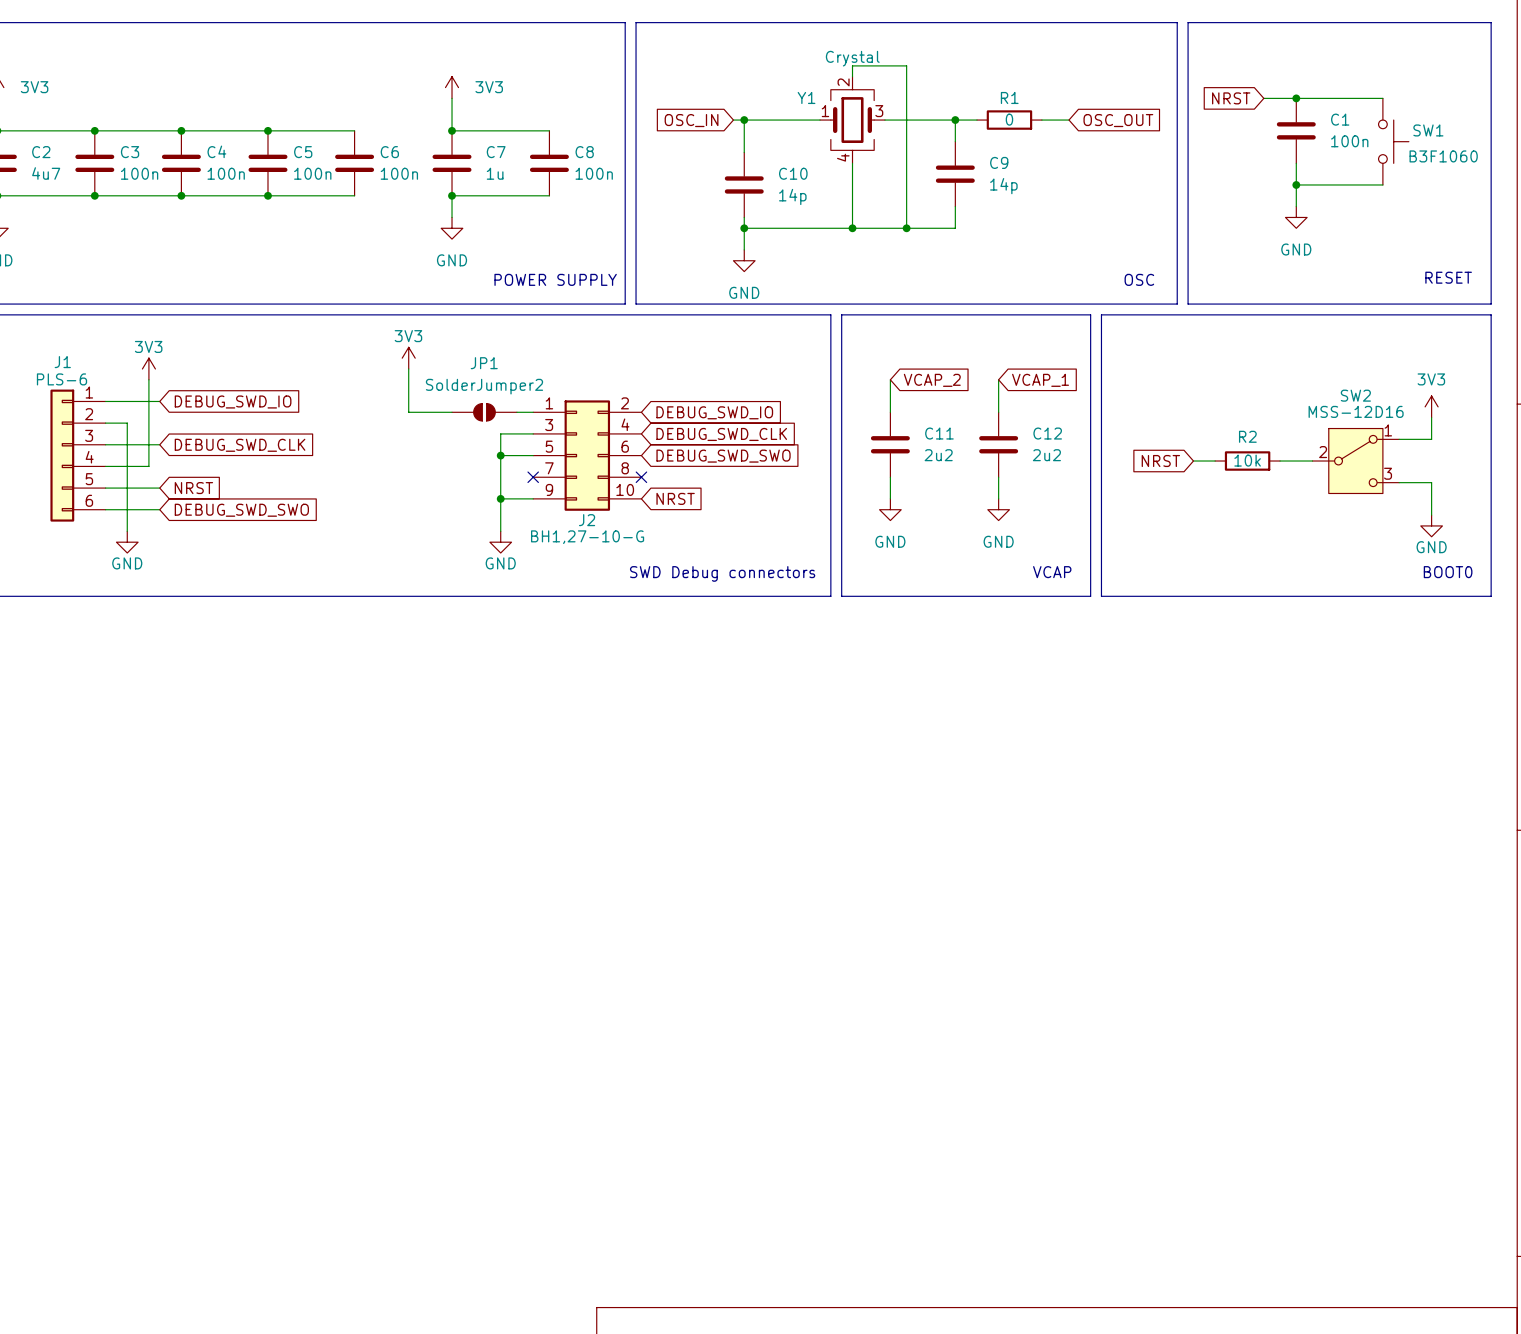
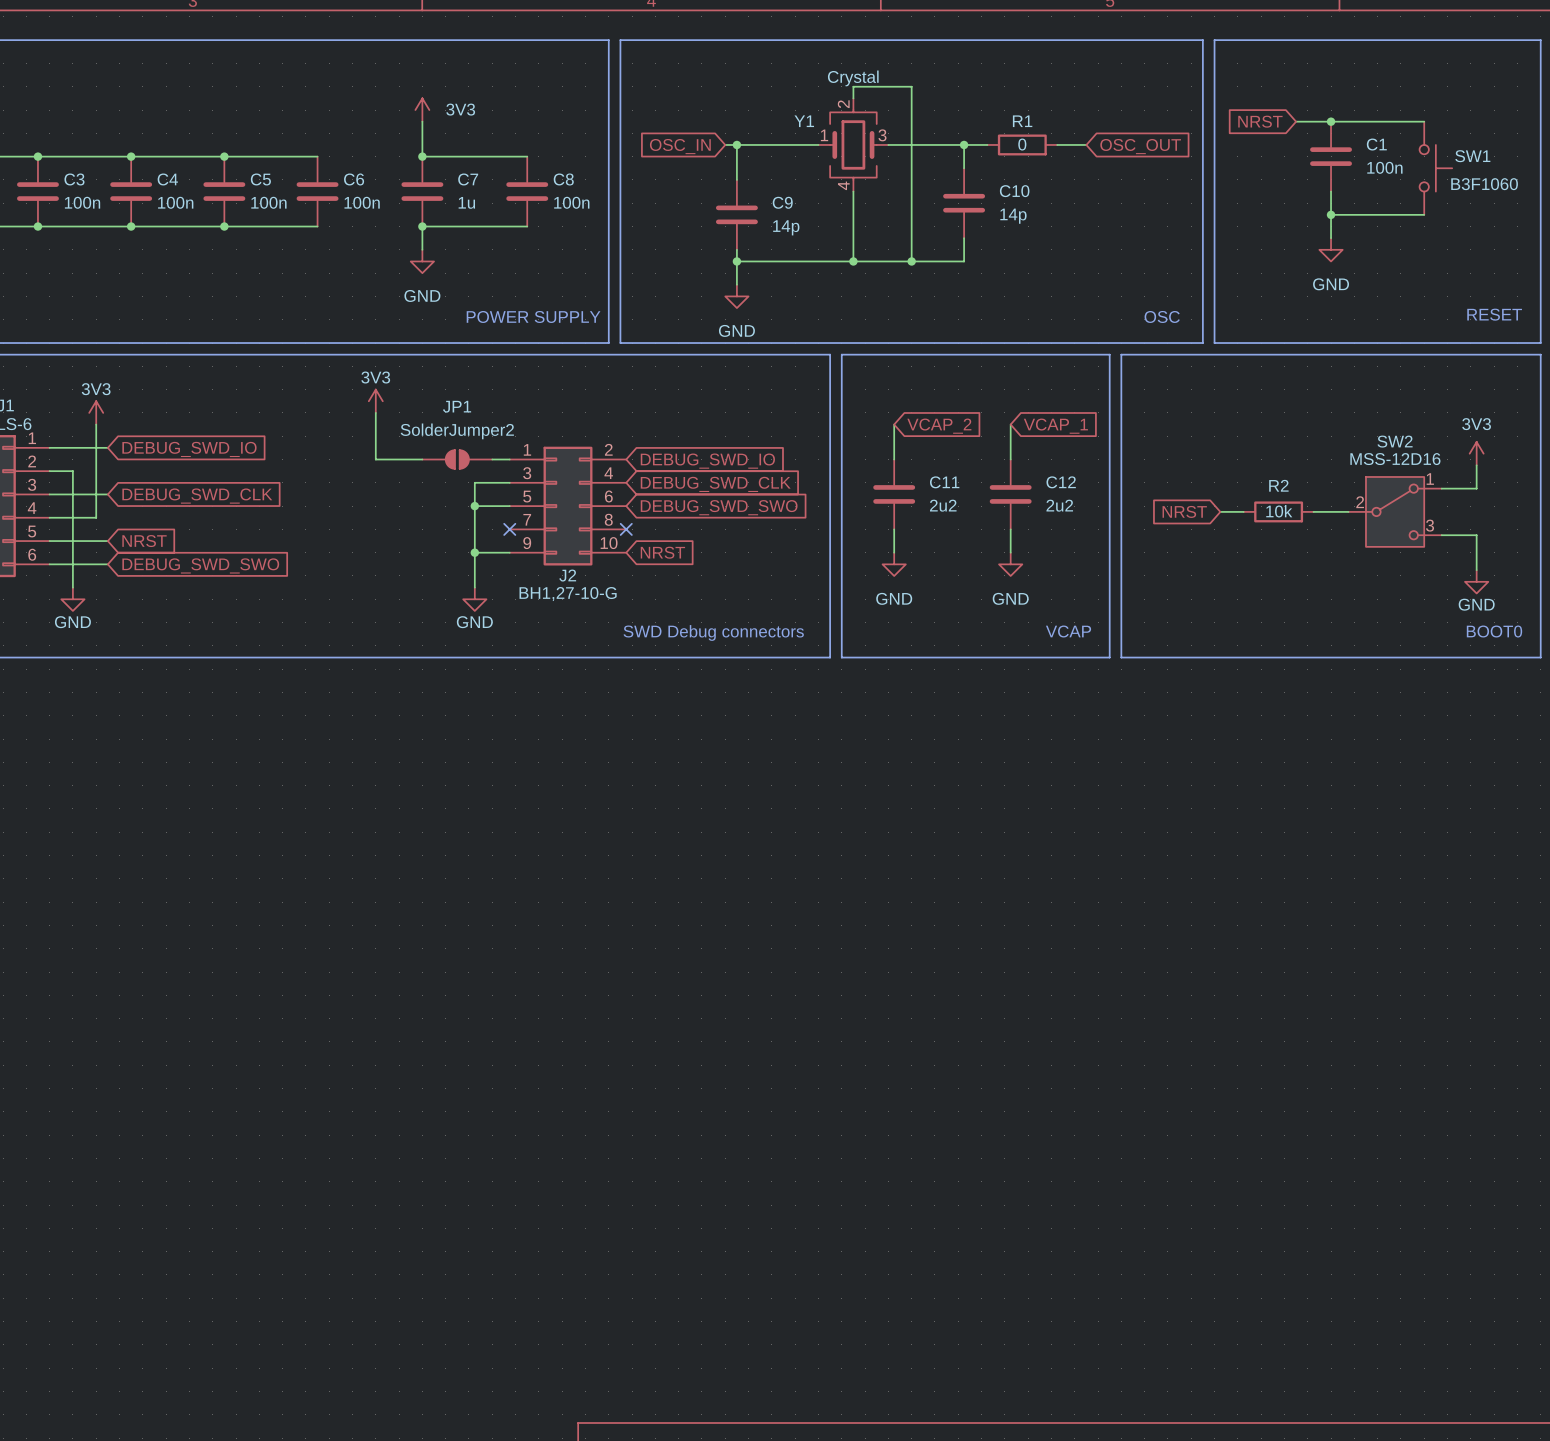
C9 name: C9 (999, 162) -> C10 (1014, 191)
C10 name: C10 (793, 173) -> C9 (782, 202)

